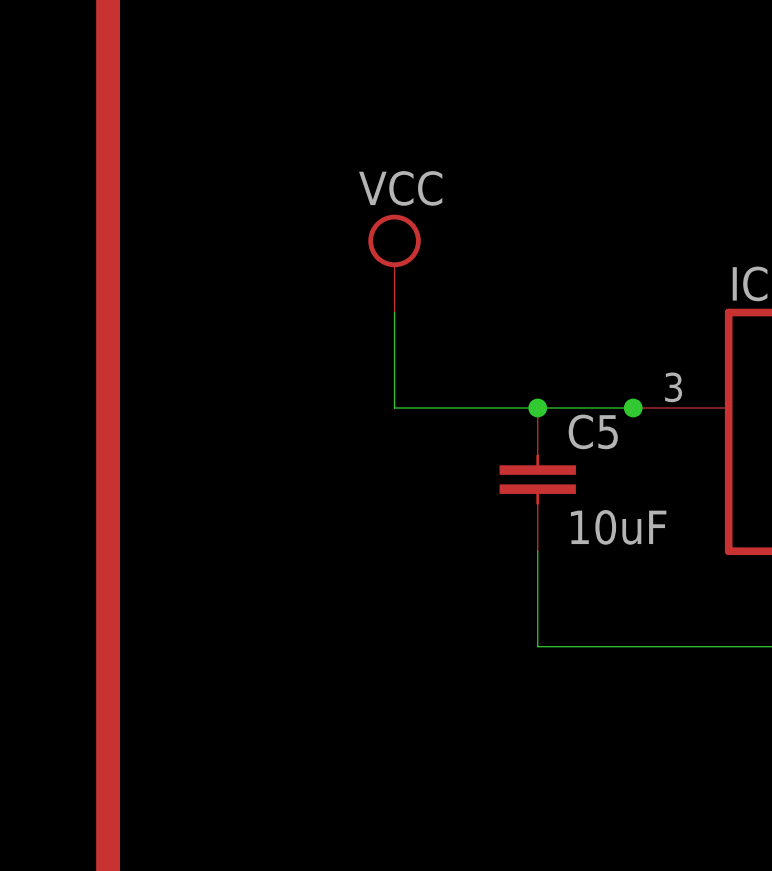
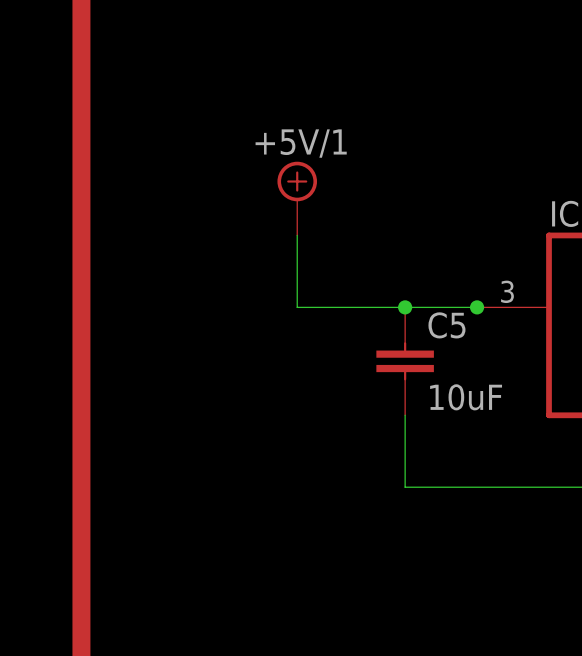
power symbol: VCC (394, 263) -> +5V/1 (297, 198)

